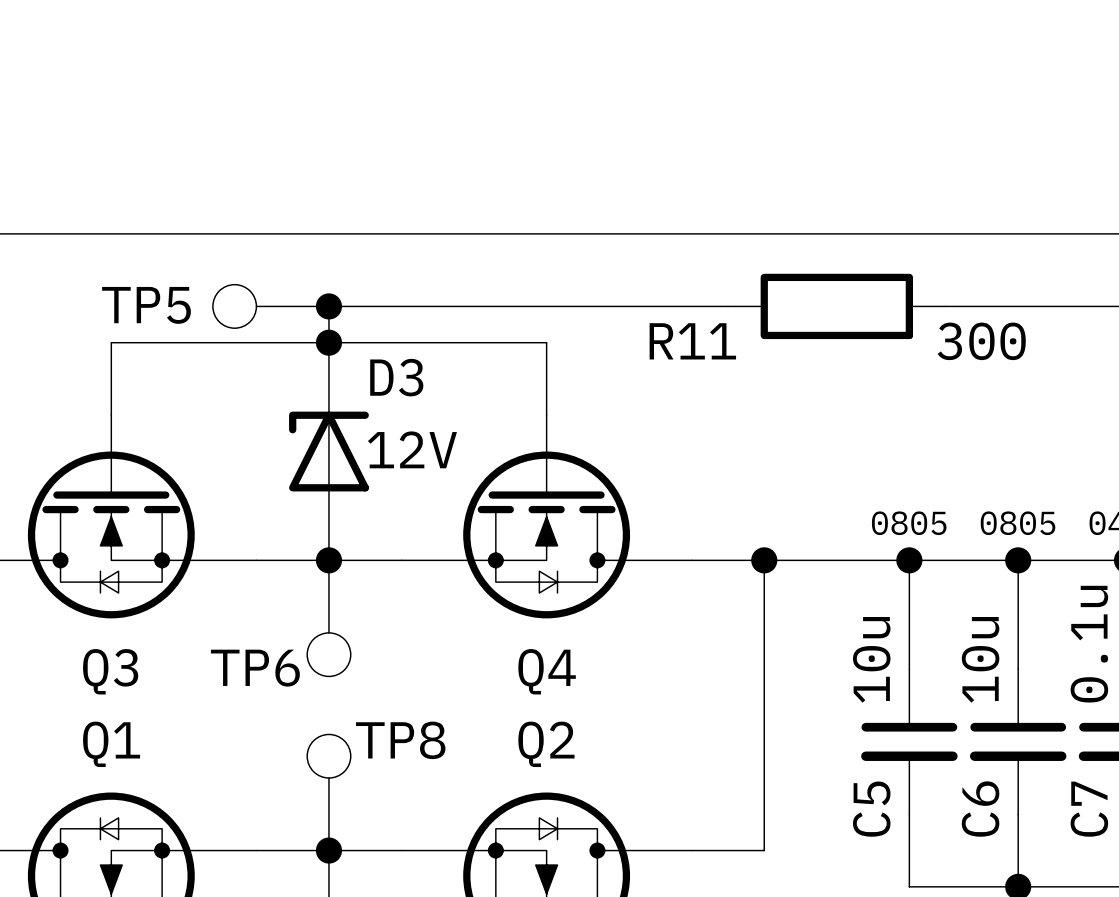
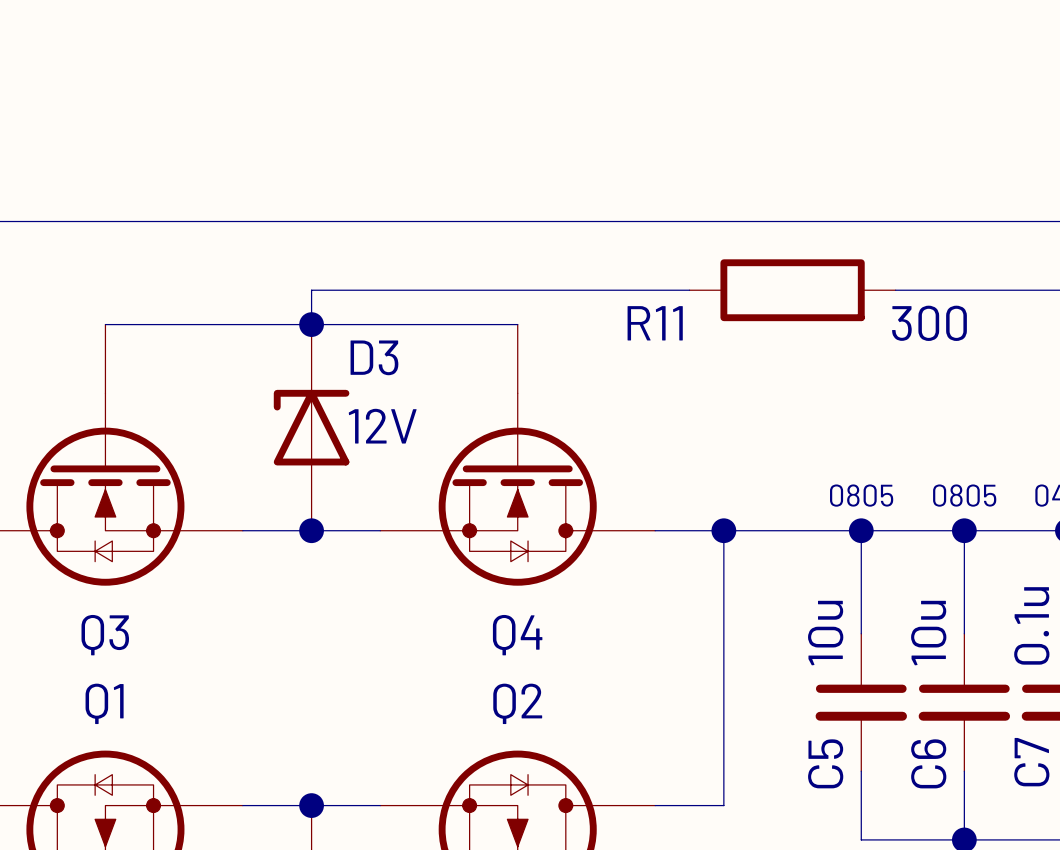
TP5: (270, 306) -> none
junction: (328, 306) -> none
TP6: (328, 618) -> none
TP8: (328, 792) -> none

